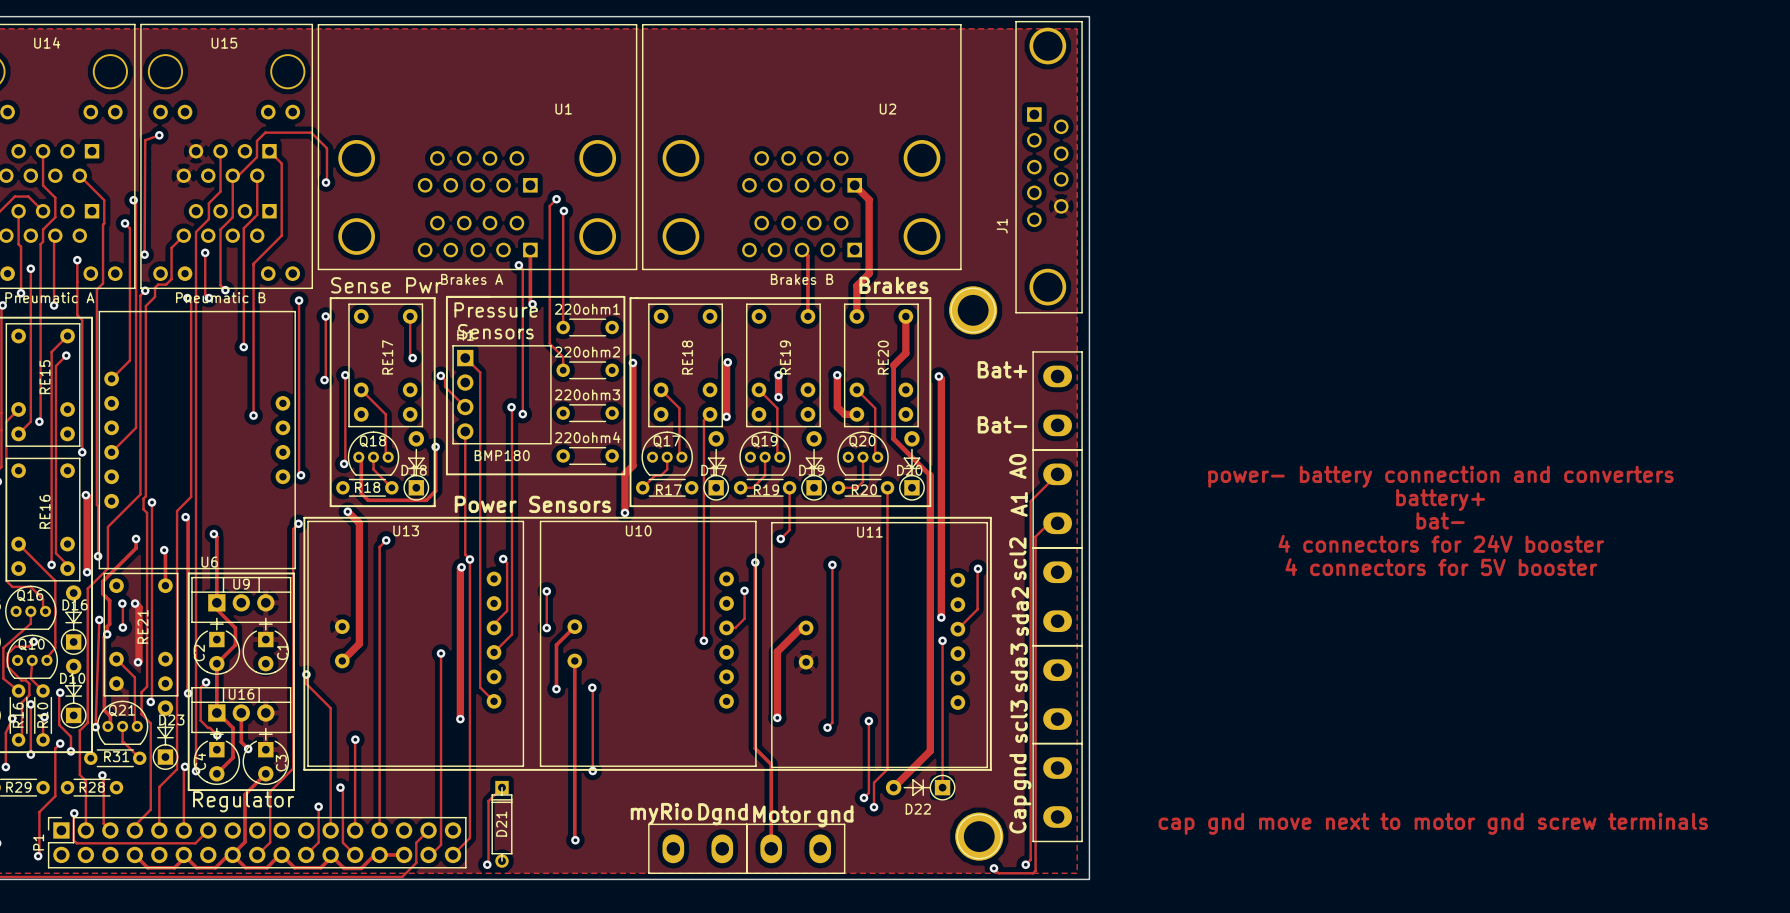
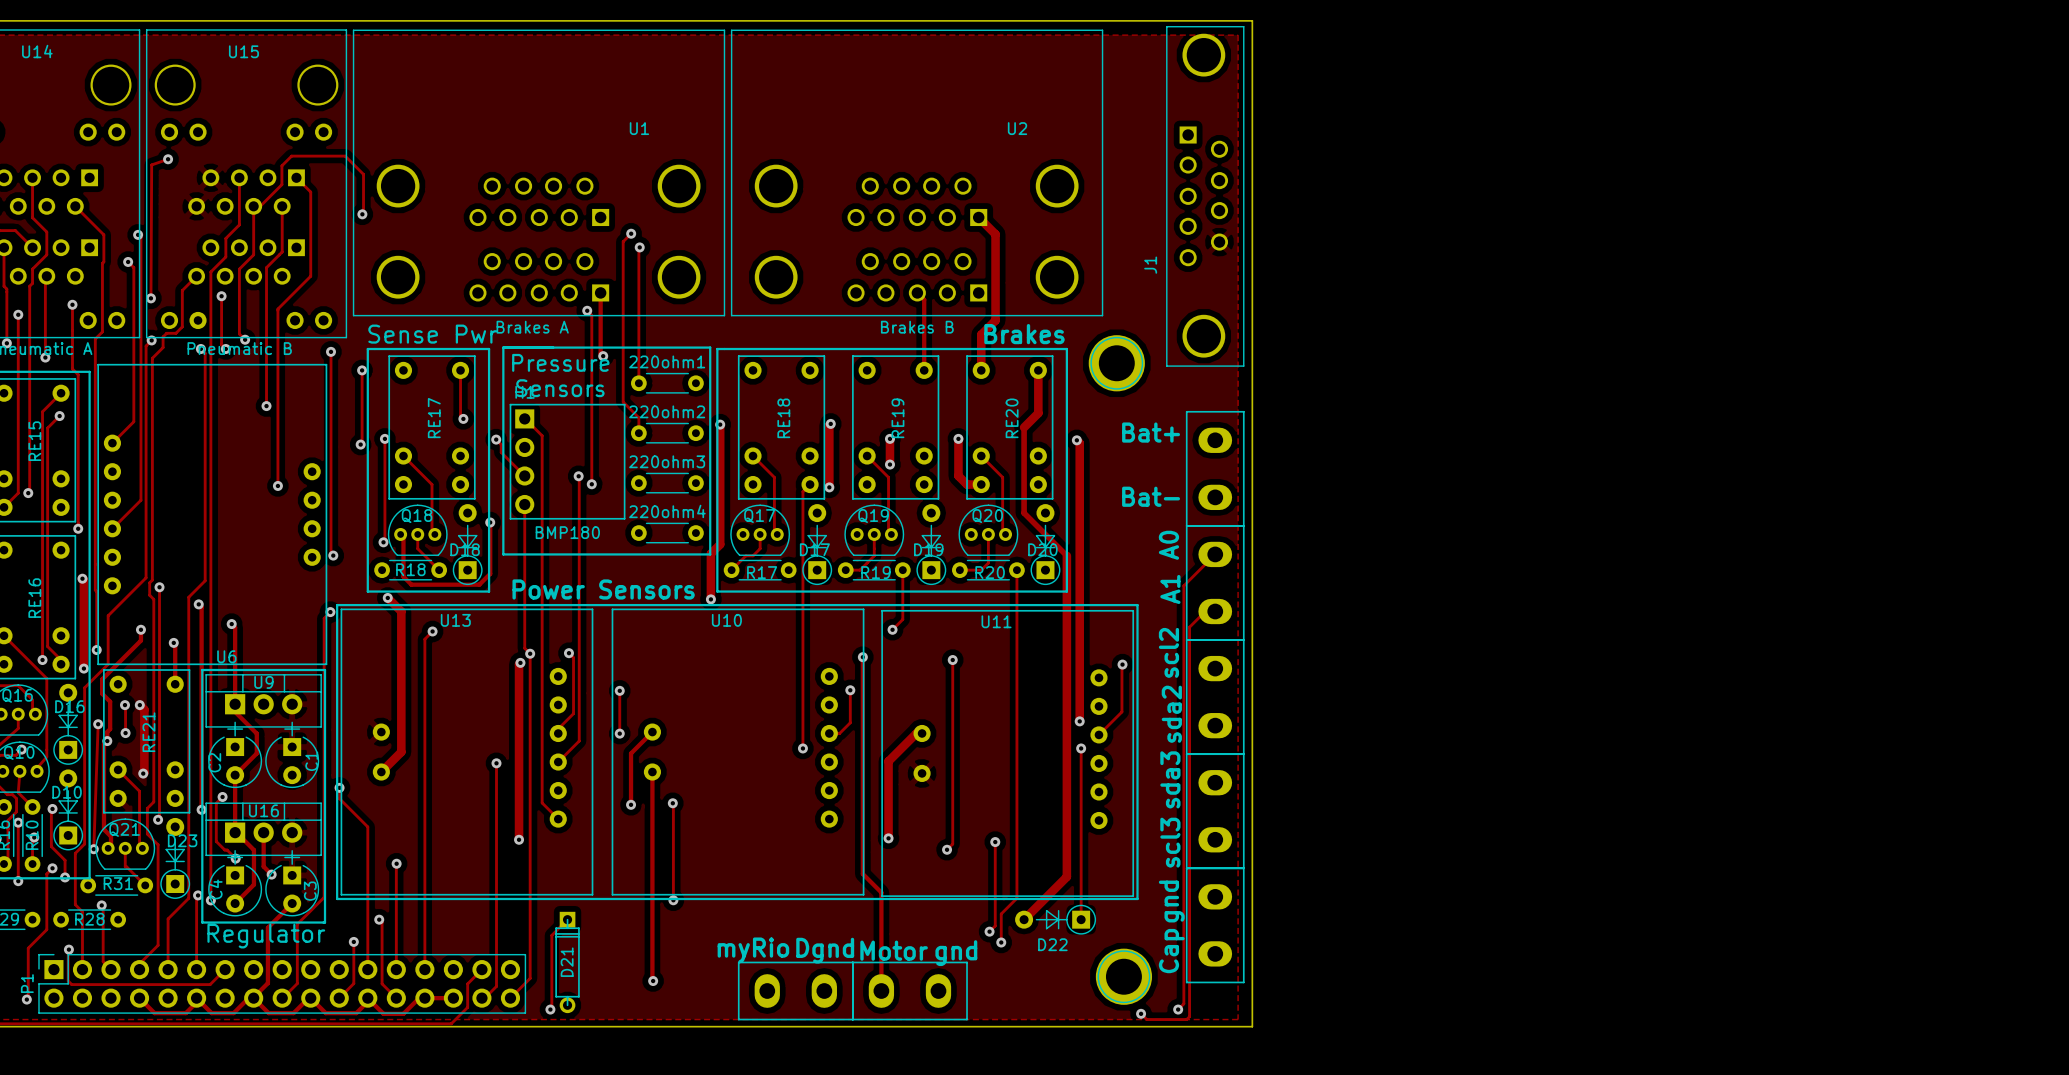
text: power- battery connection and converters (1440, 476) -> none
text: battery+ (1440, 500) -> none
text: bat- (1440, 520) -> none
text: 4 connectors for 24V booster (1441, 543) -> none
text: 4 connectors for 5V booster (1441, 567) -> none
text: cap gnd move next to motor gnd screw terminals (1433, 823) -> none

